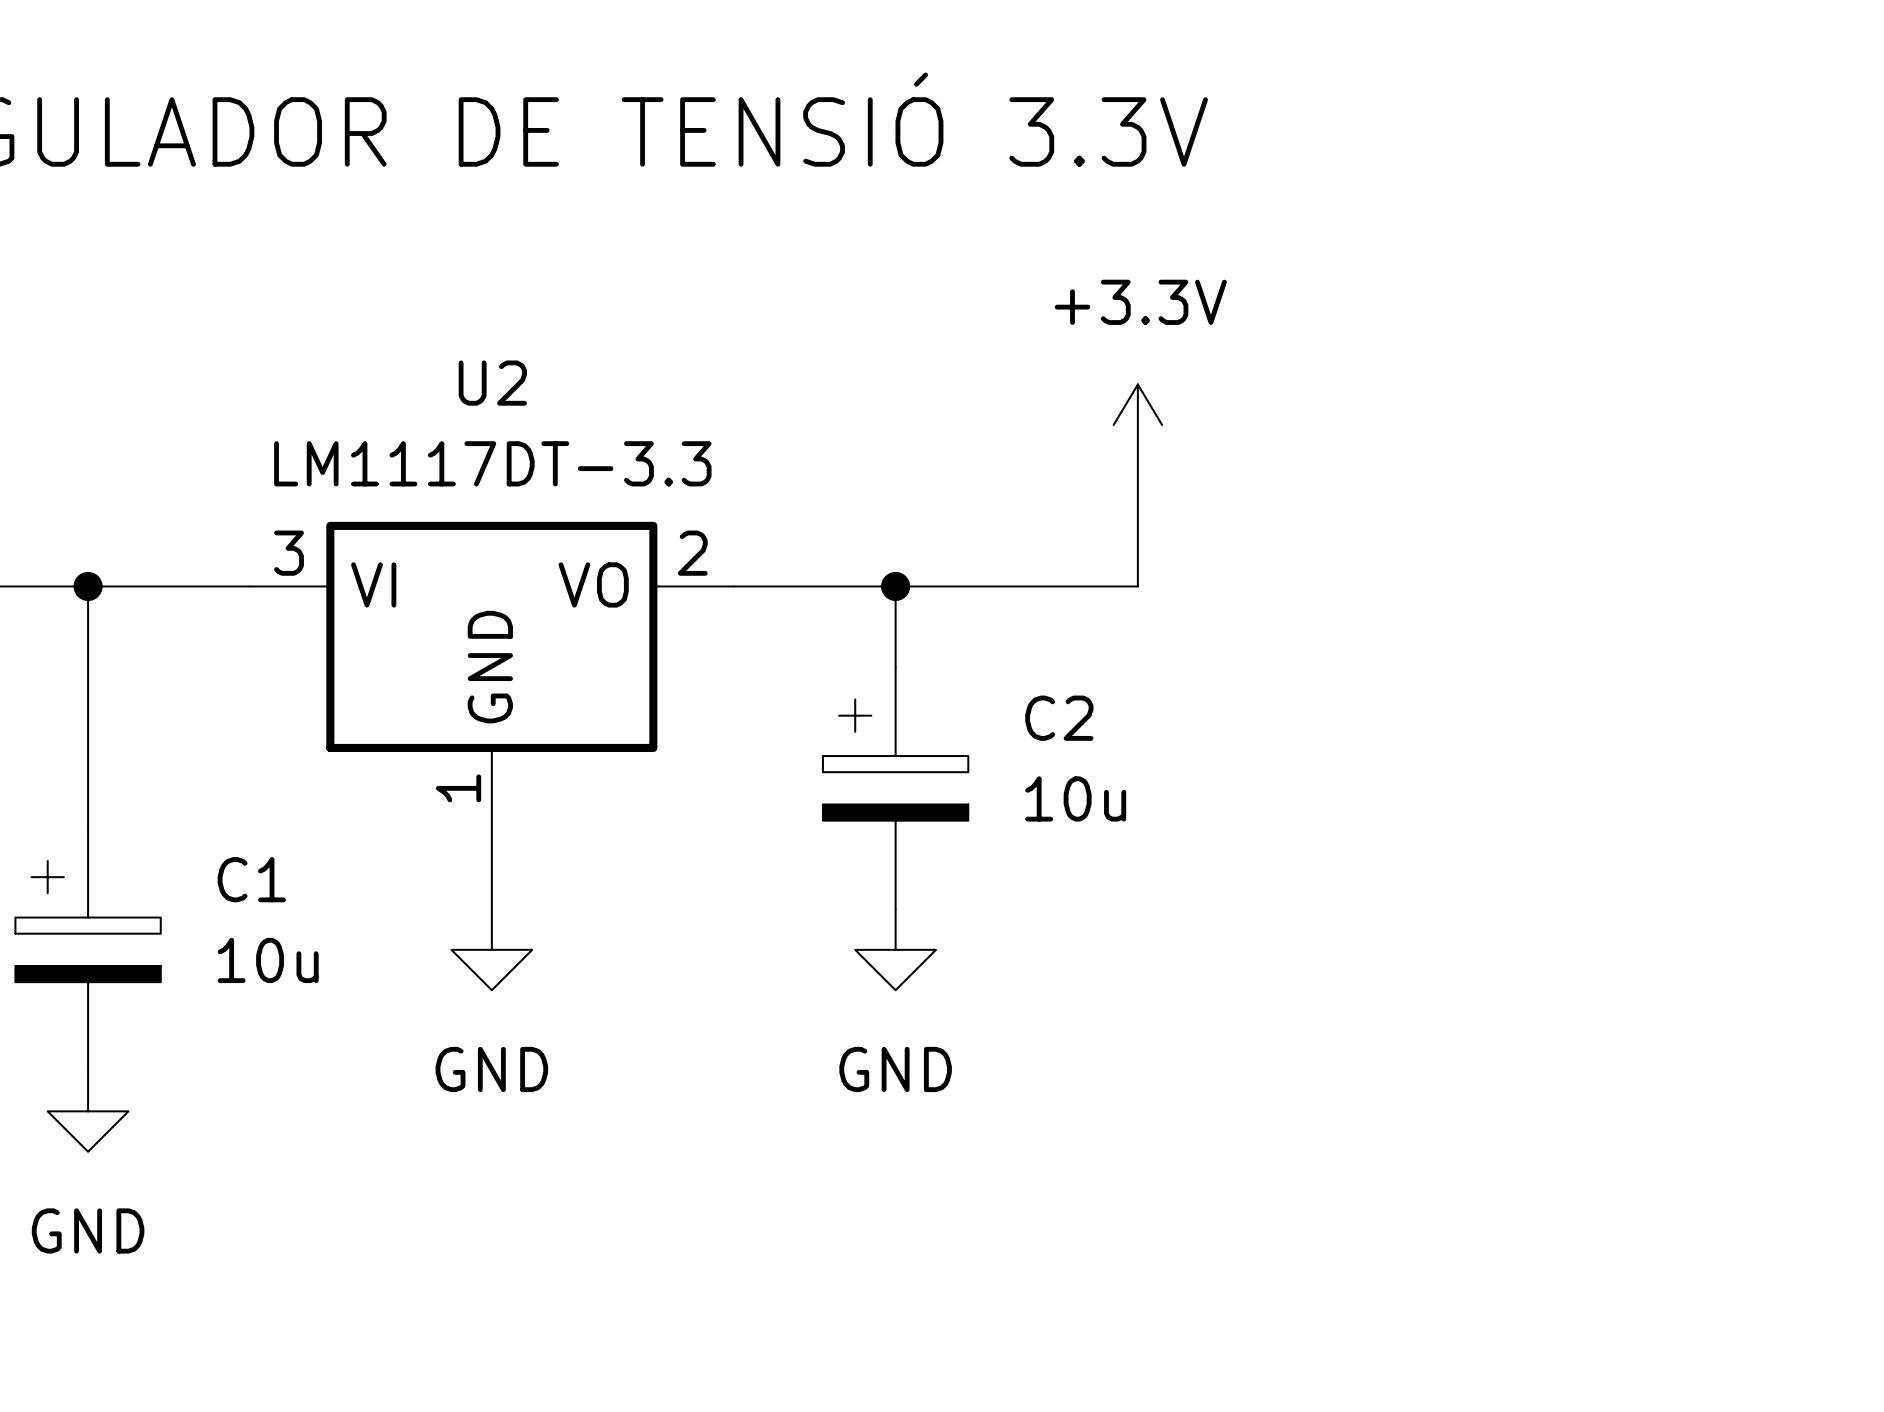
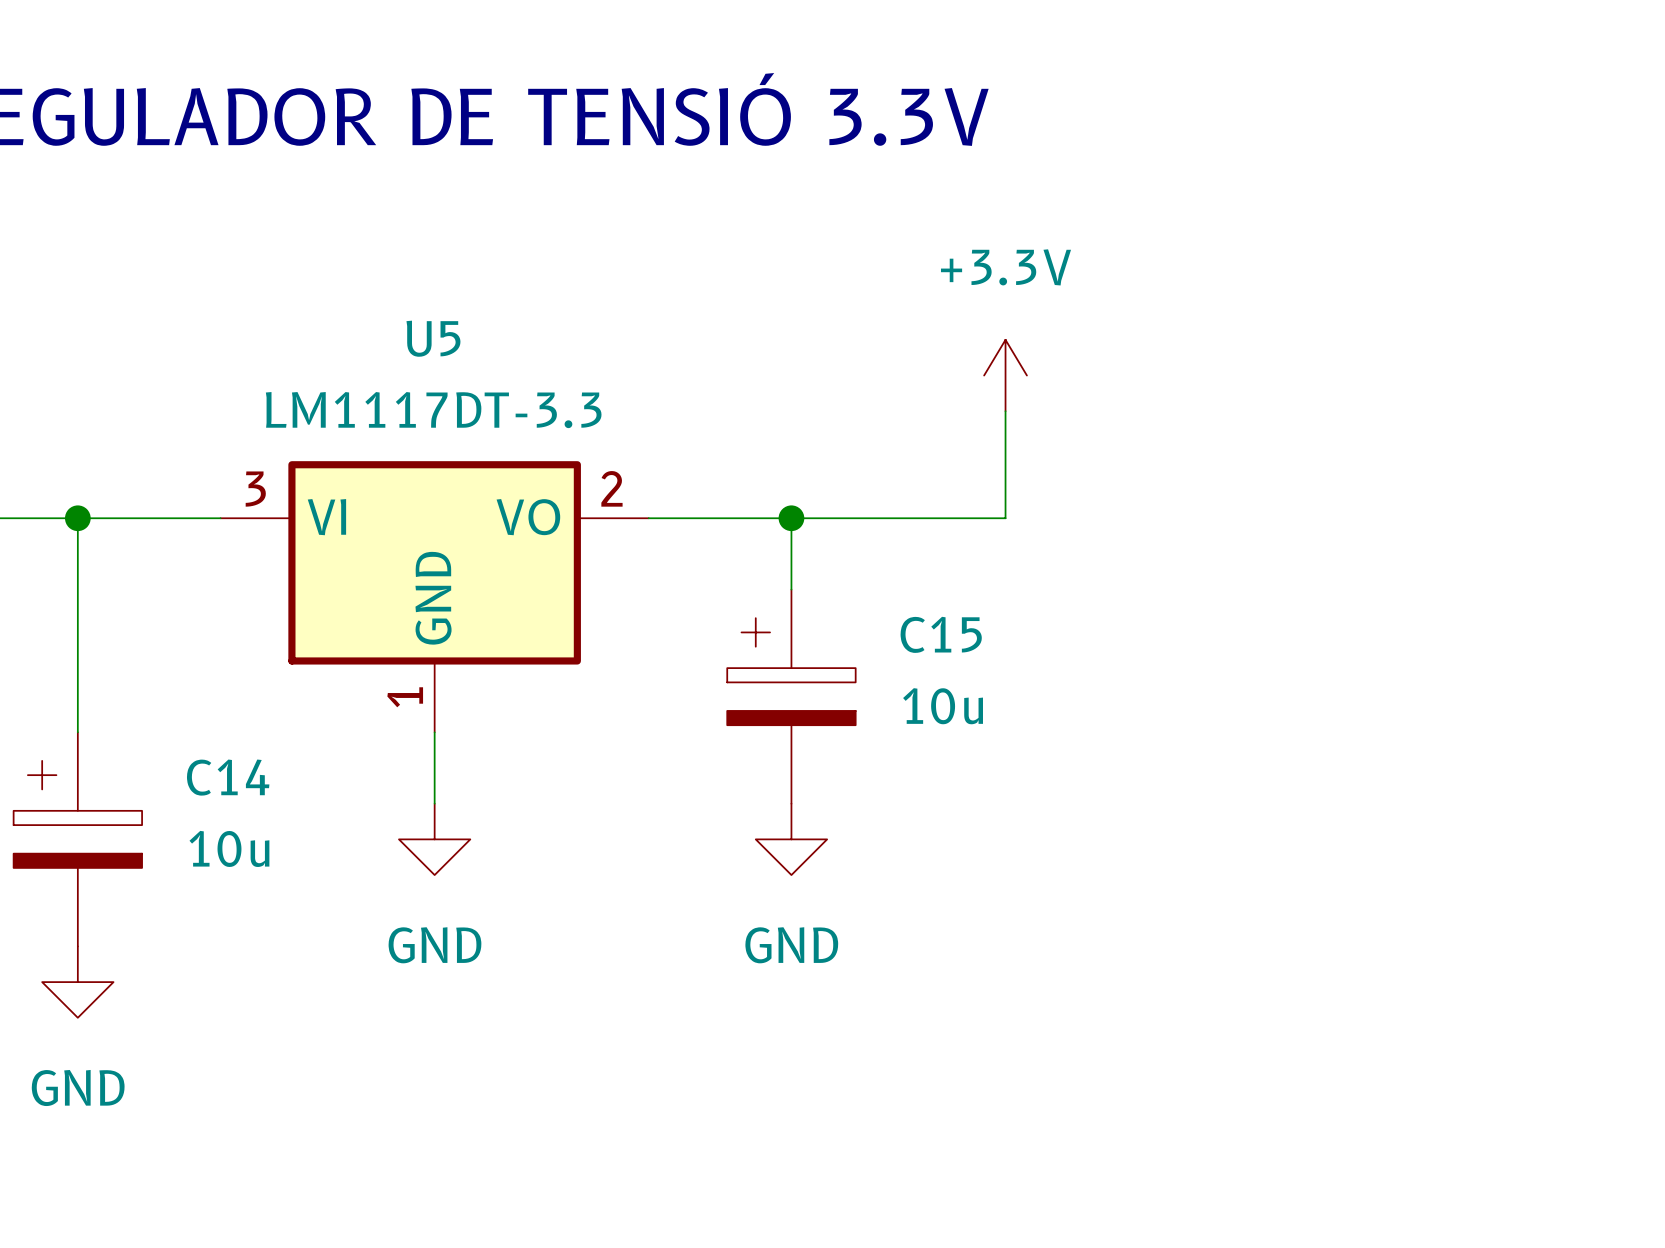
U2 name: U2 (492, 383) -> U5 (433, 338)
C2 name: C2 (1059, 718) -> C15 (941, 634)
C1 name: C1 (251, 879) -> C14 (228, 777)

